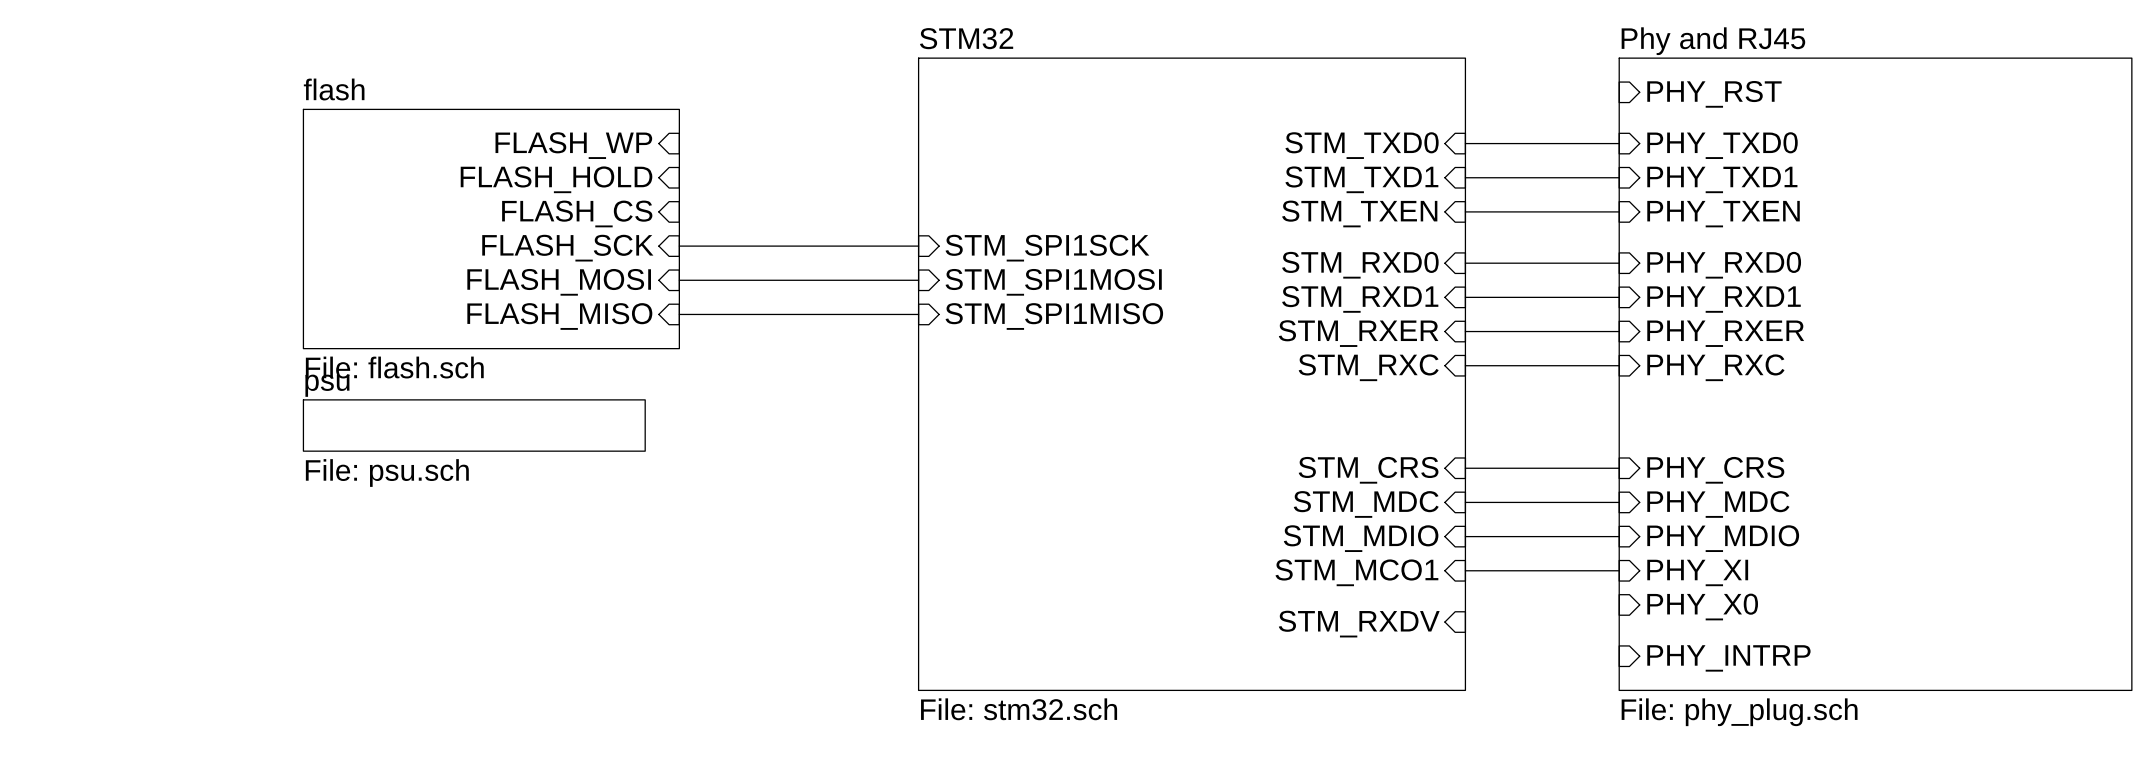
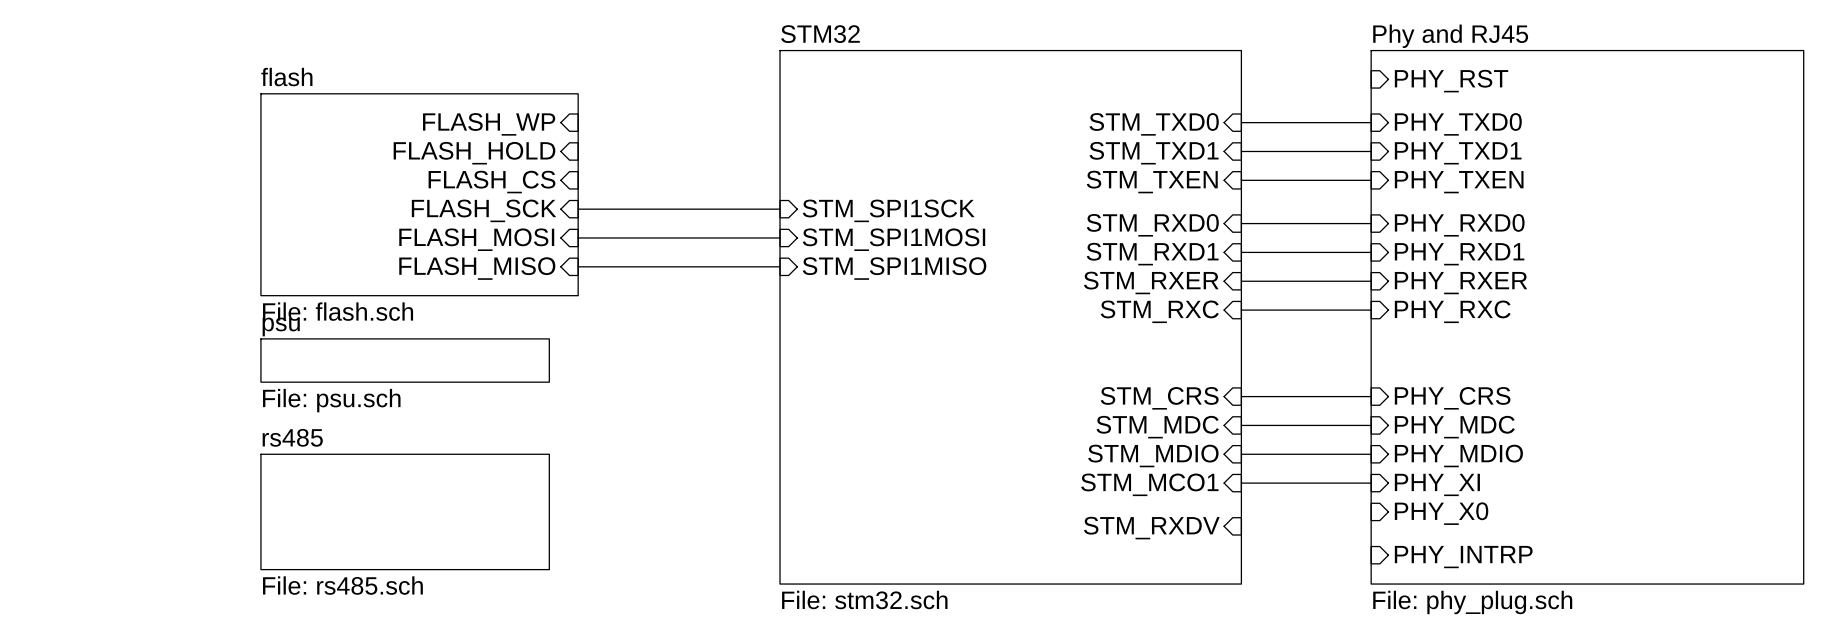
sheet rs485: none -> File: rs485.sch (405, 511)

